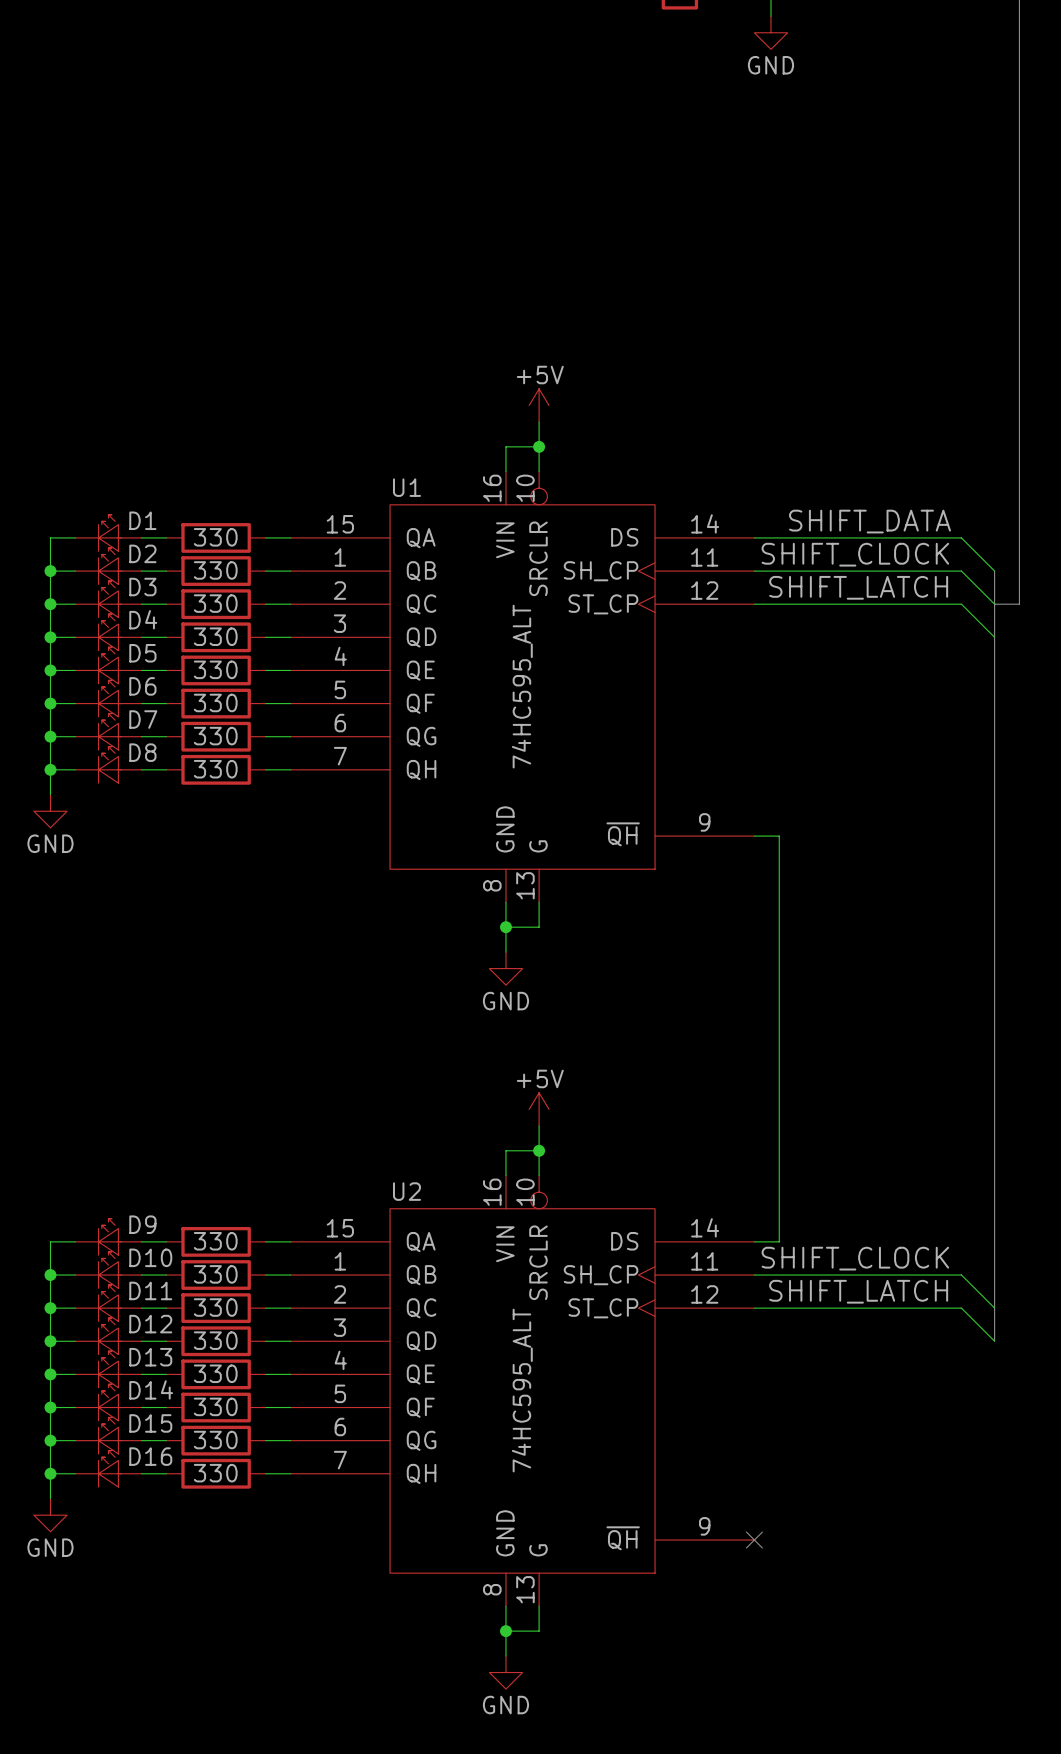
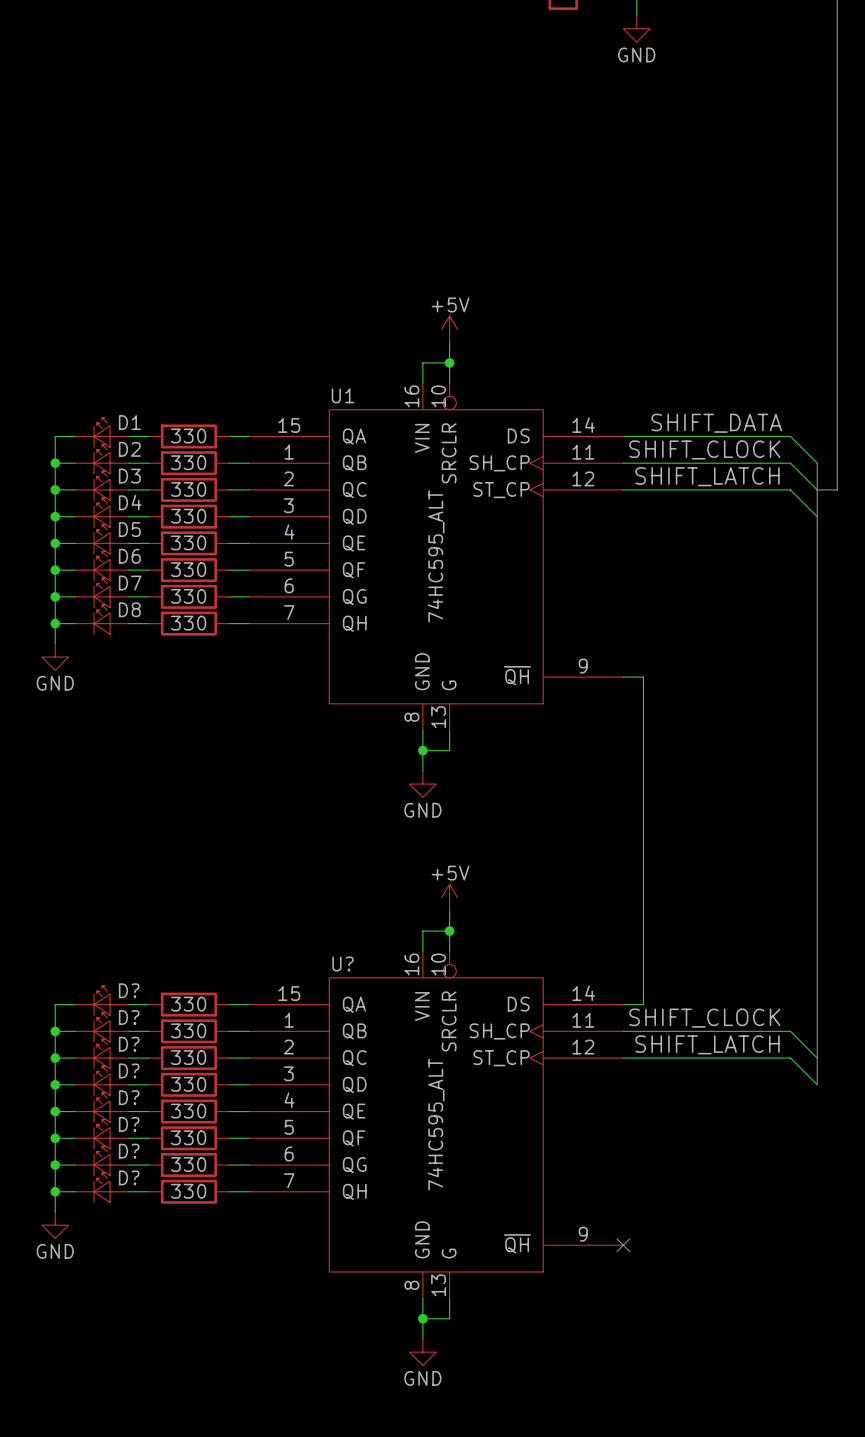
U2 name: U2 (406, 1191) -> U? (342, 964)
D9 name: D9 (142, 1224) -> D? (129, 990)
D10 name: D10 (150, 1257) -> D? (129, 1017)
D11 name: D11 (150, 1290) -> D? (129, 1044)
D12 name: D12 (150, 1324) -> D? (129, 1070)
D13 name: D13 (150, 1357) -> D? (129, 1097)
D14 name: D14 (151, 1389) -> D? (129, 1124)
D15 name: D15 (150, 1423) -> D? (129, 1151)
D16 name: D16 (150, 1456) -> D? (129, 1177)

